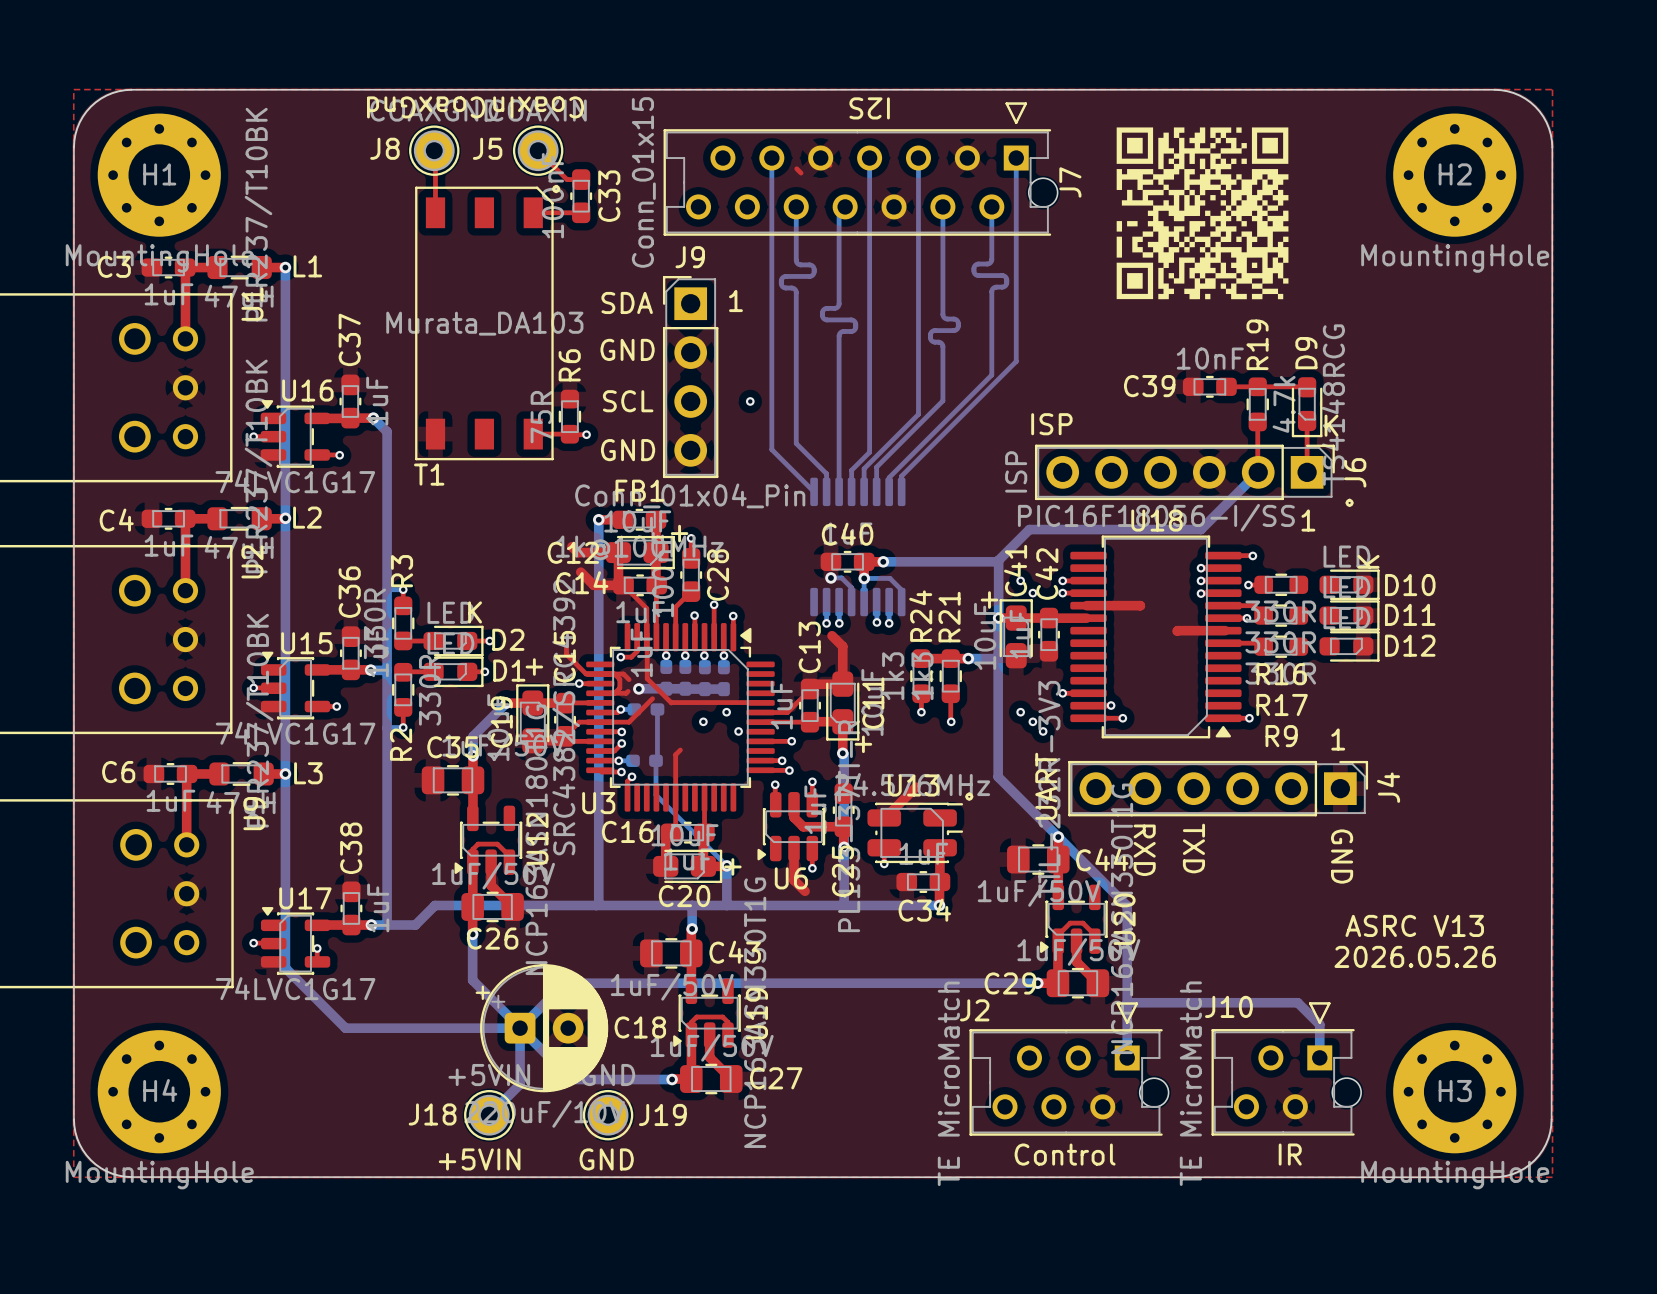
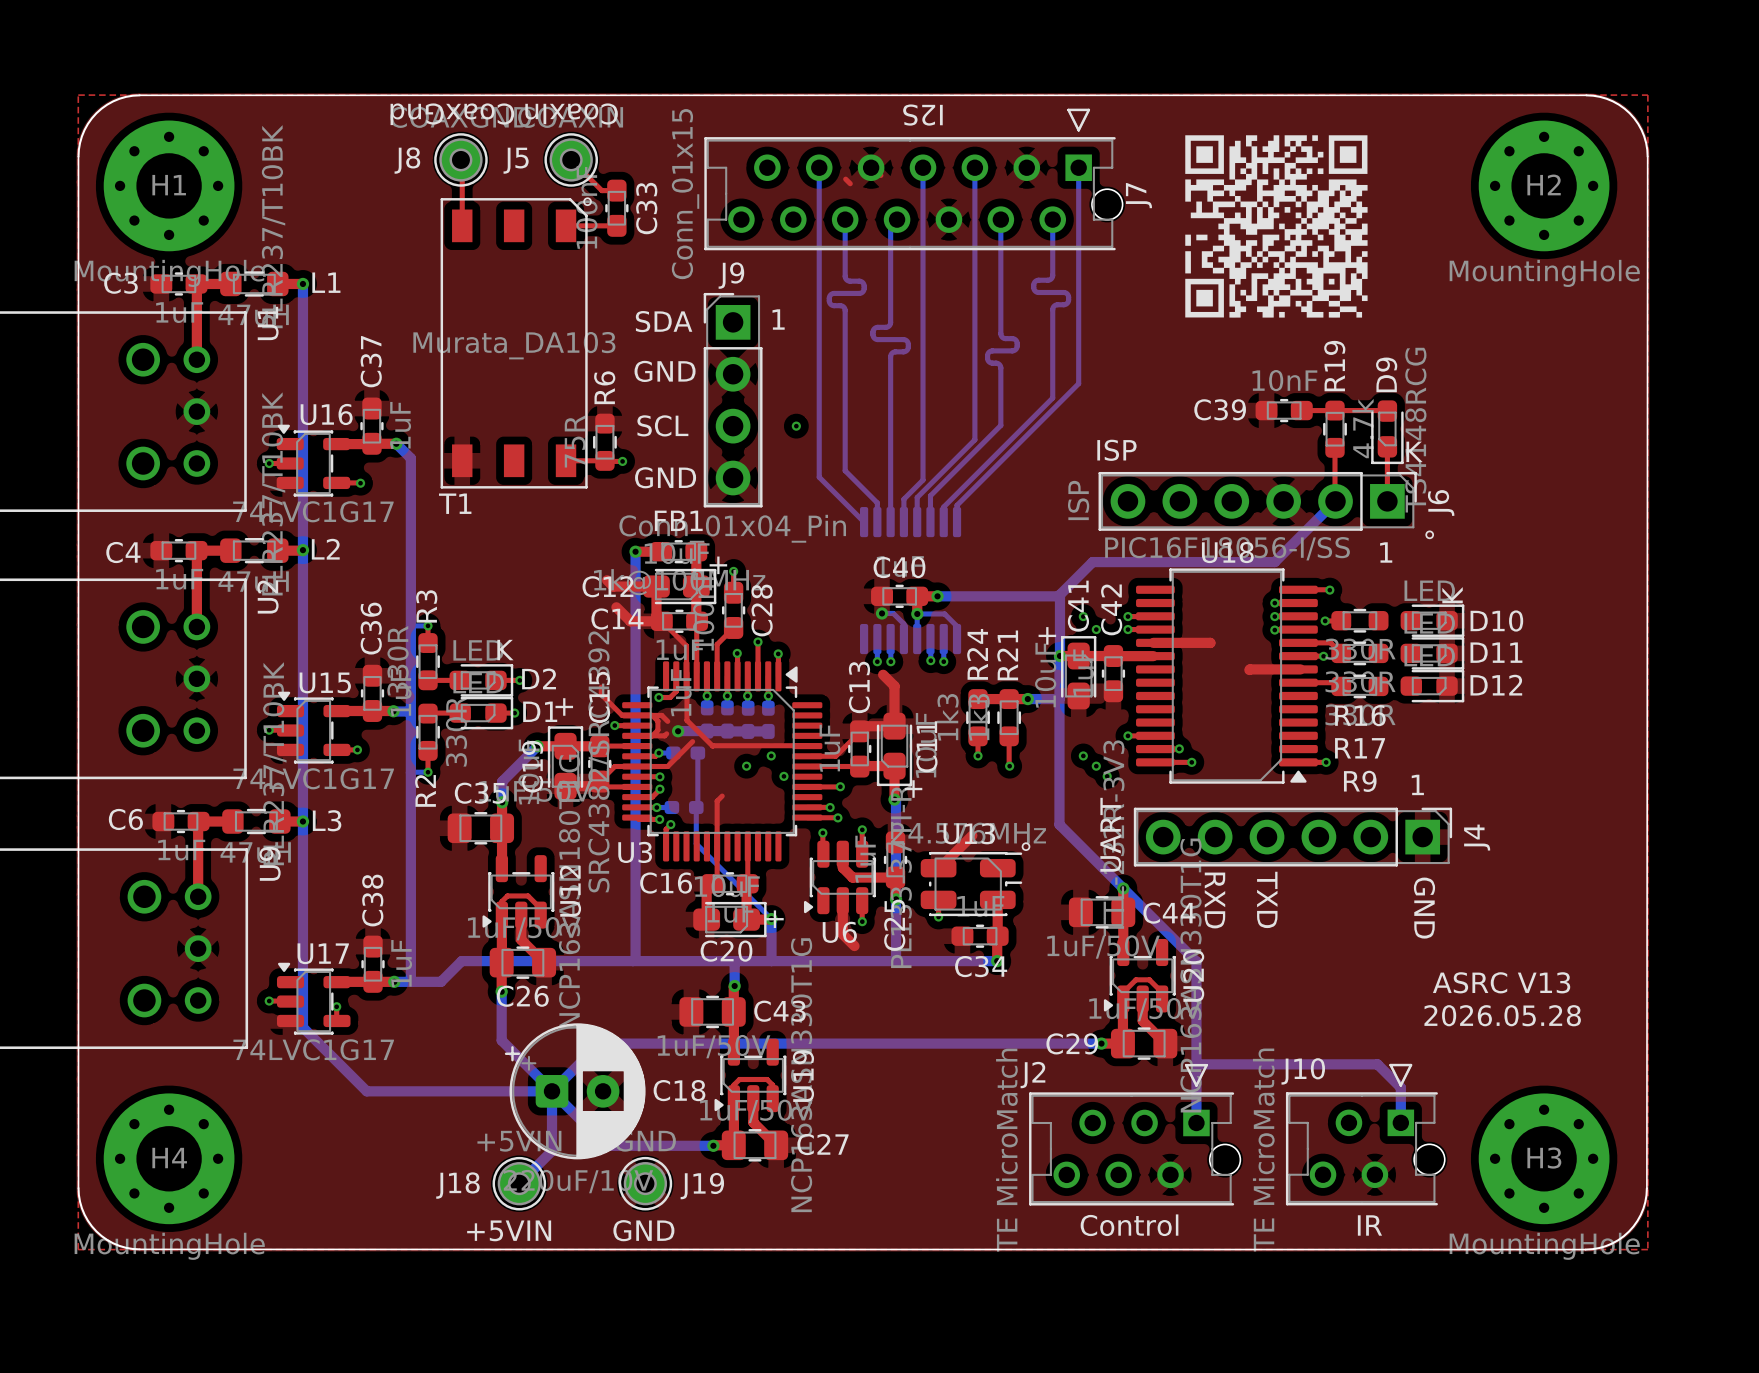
text: 2026.05.26 (1415, 956) -> 2026.05.28 (1502, 1015)

